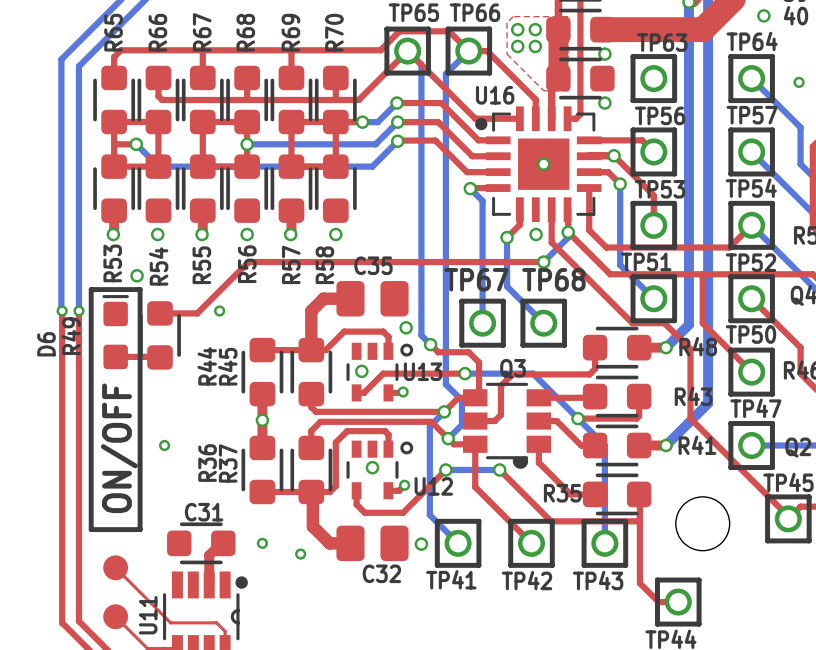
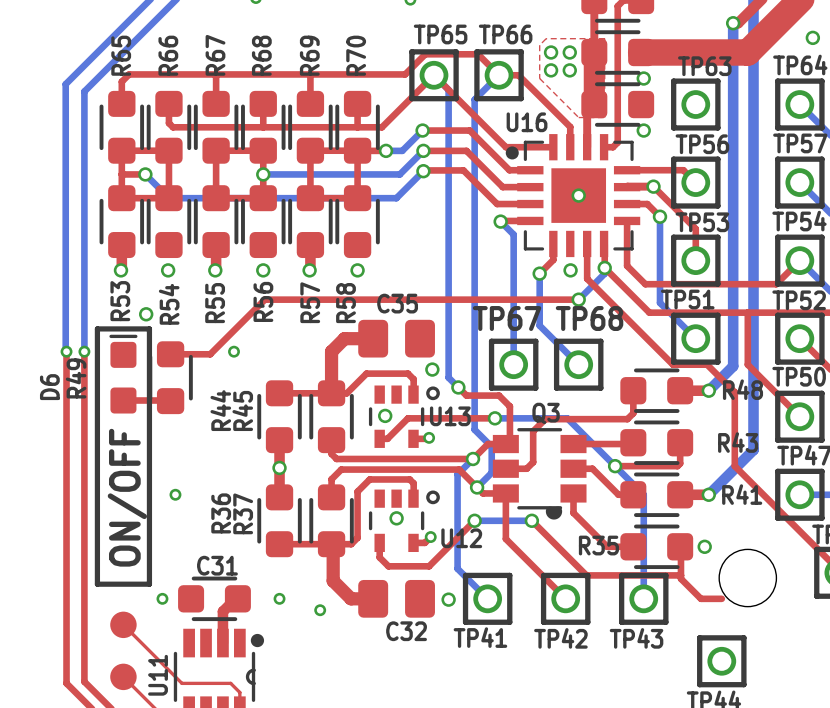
via: none -> (704, 546)
top track: (639, 524) (639, 583) (658, 602) (678, 602) -> (680, 578) (700, 598) (721, 598)
via: none -> (162, 598)

